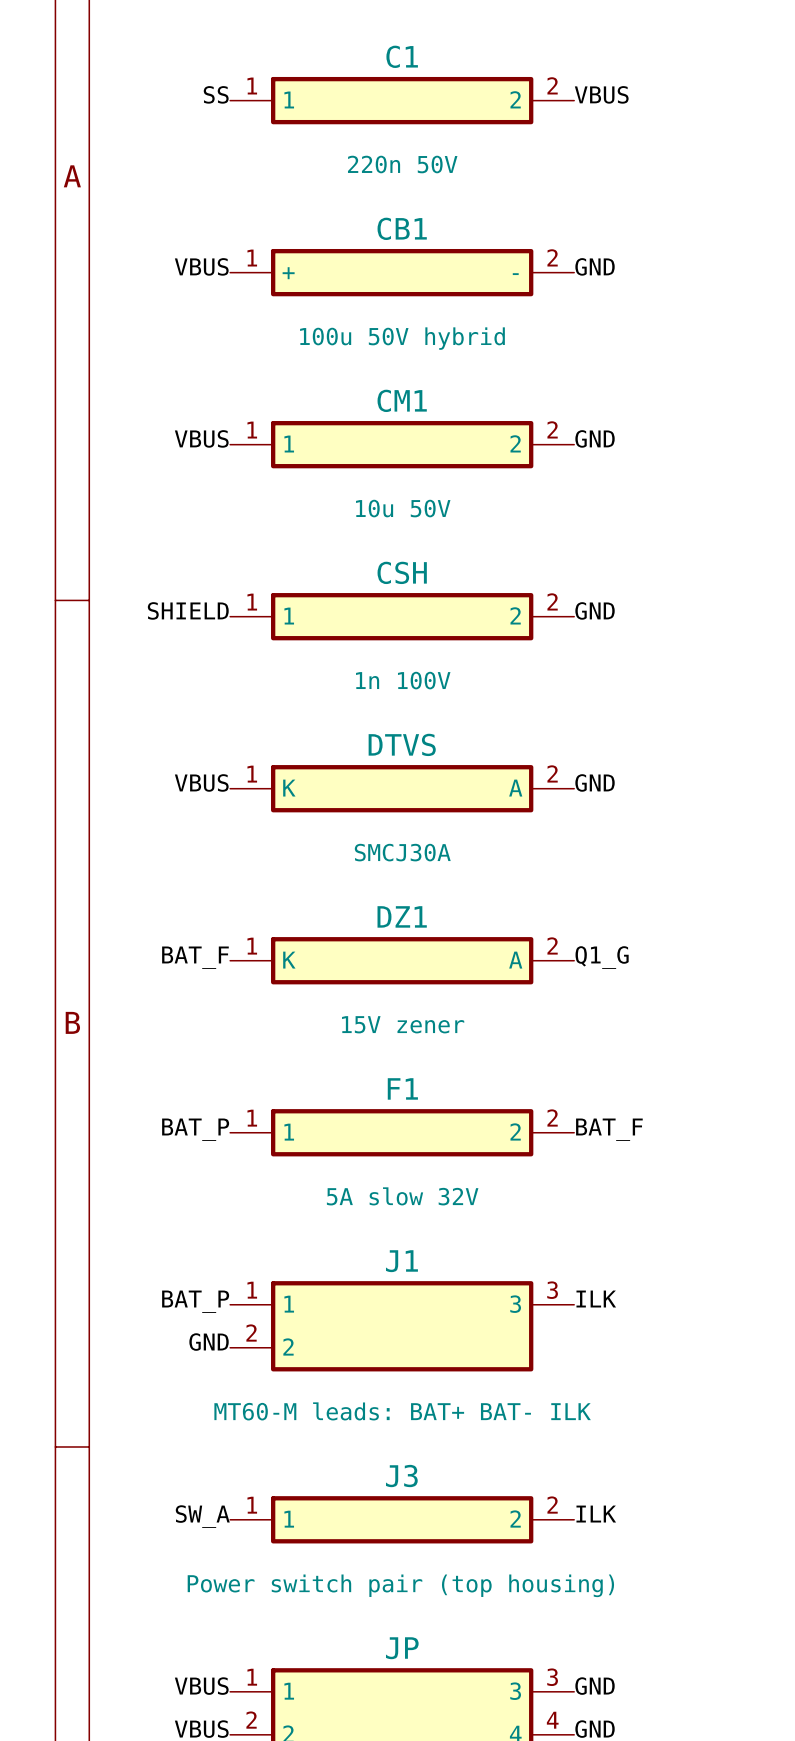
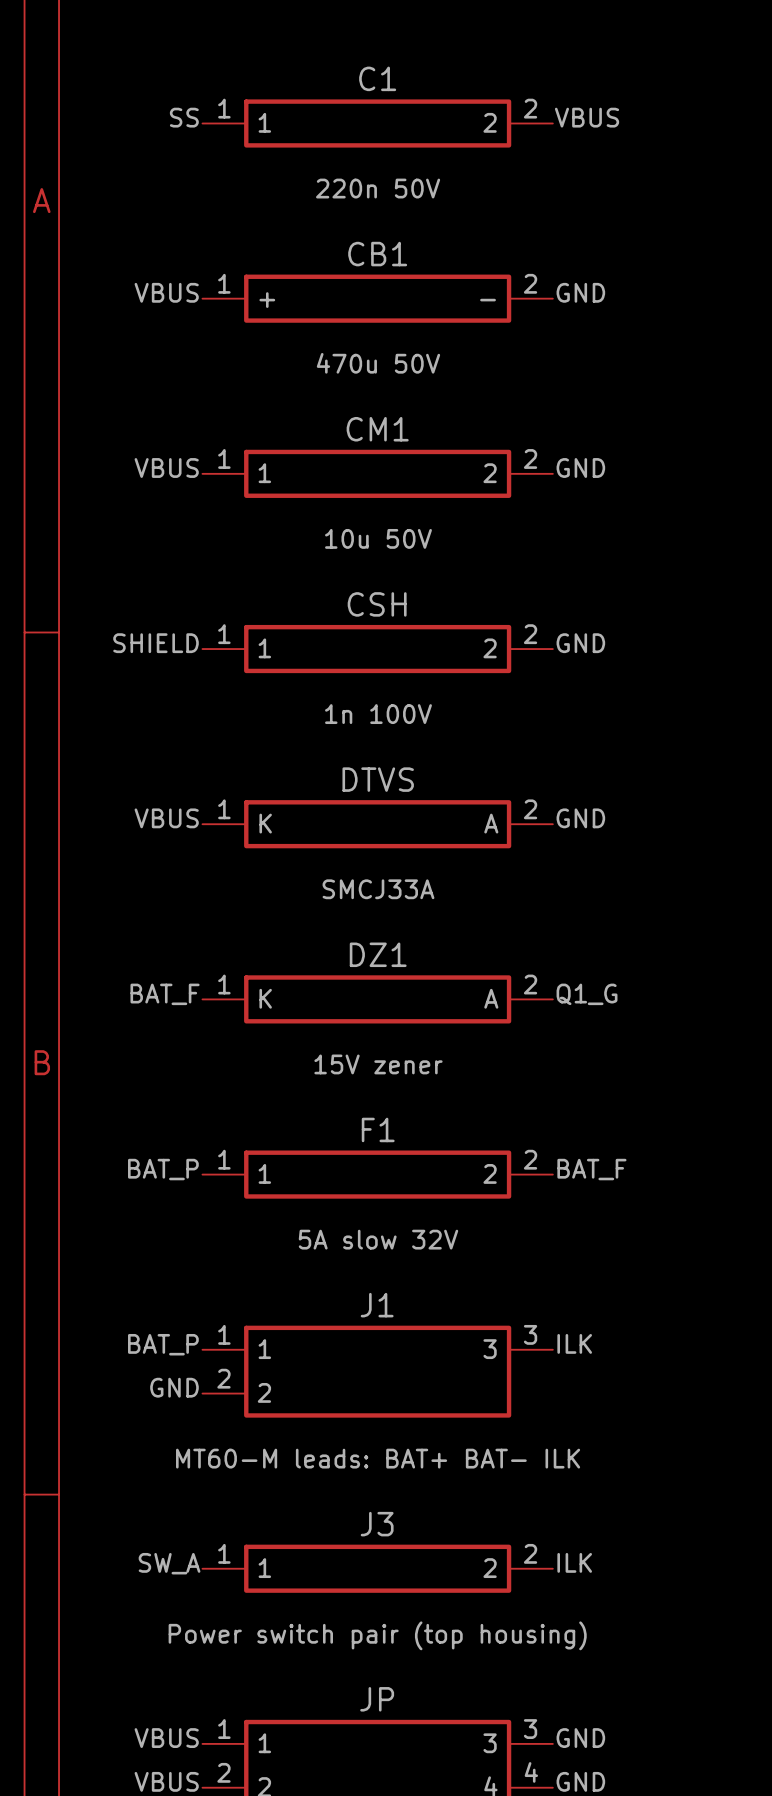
CB1 value: 100u 50V hybrid (402, 338) -> 470u 50V (378, 363)
DTVS value: SMCJ30A (402, 852) -> SMCJ33A (378, 889)

